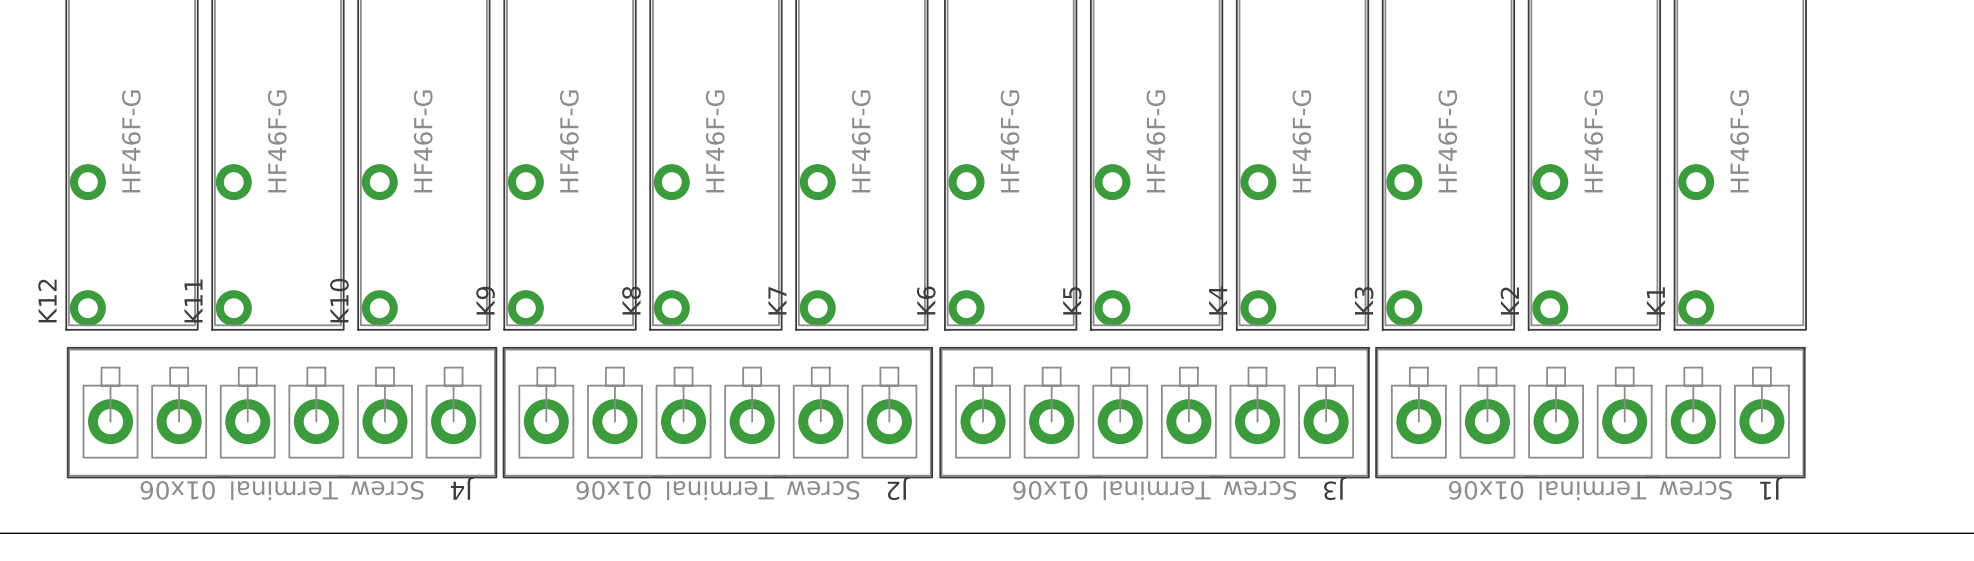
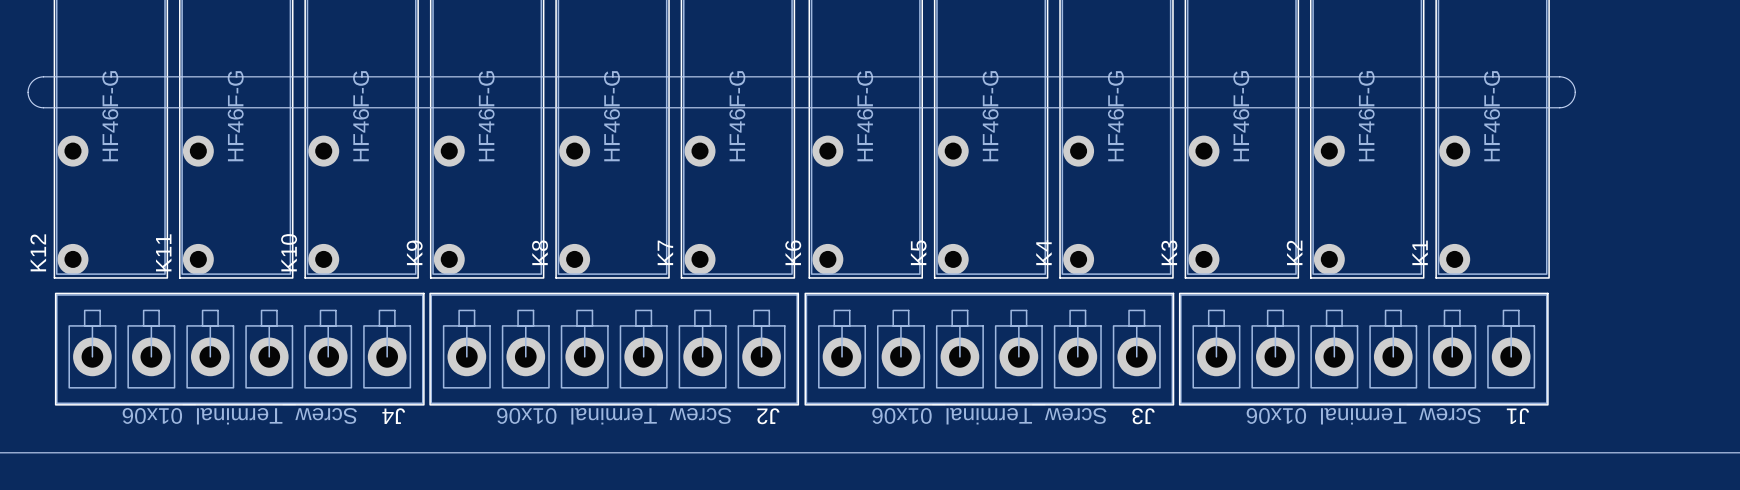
board edge: none -> (43, 76) (1559, 76) (1570, 81) (1575, 92) (1570, 103) (1559, 107) (43, 107) (32, 103) (28, 92) (32, 81) (43, 76)

